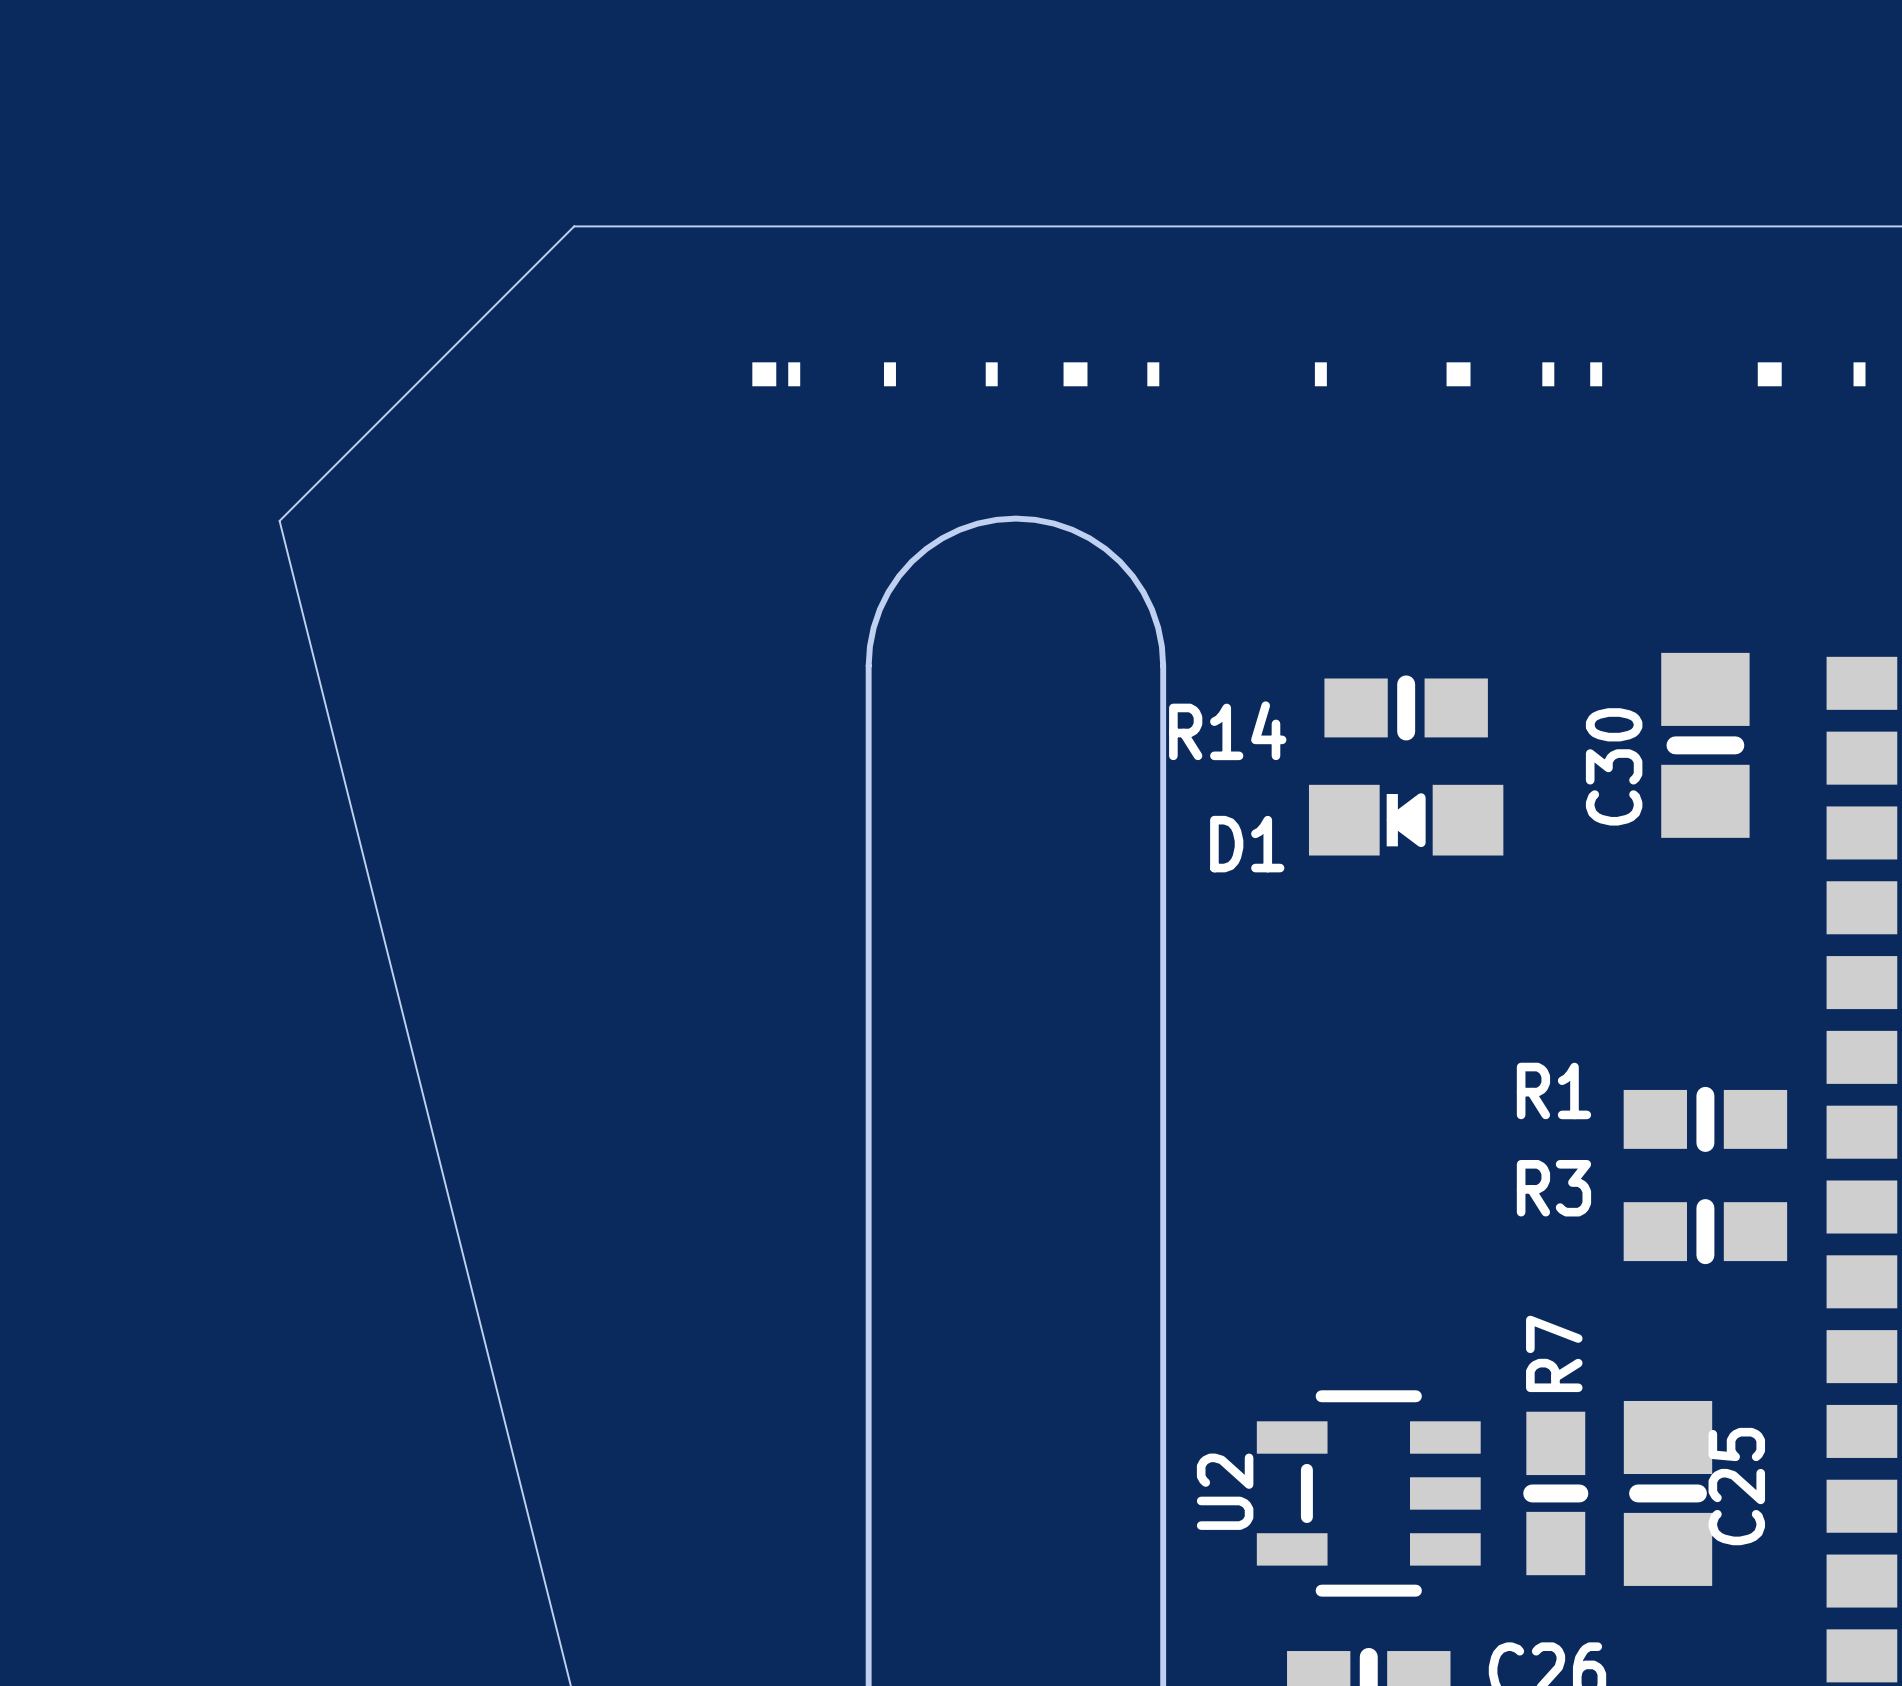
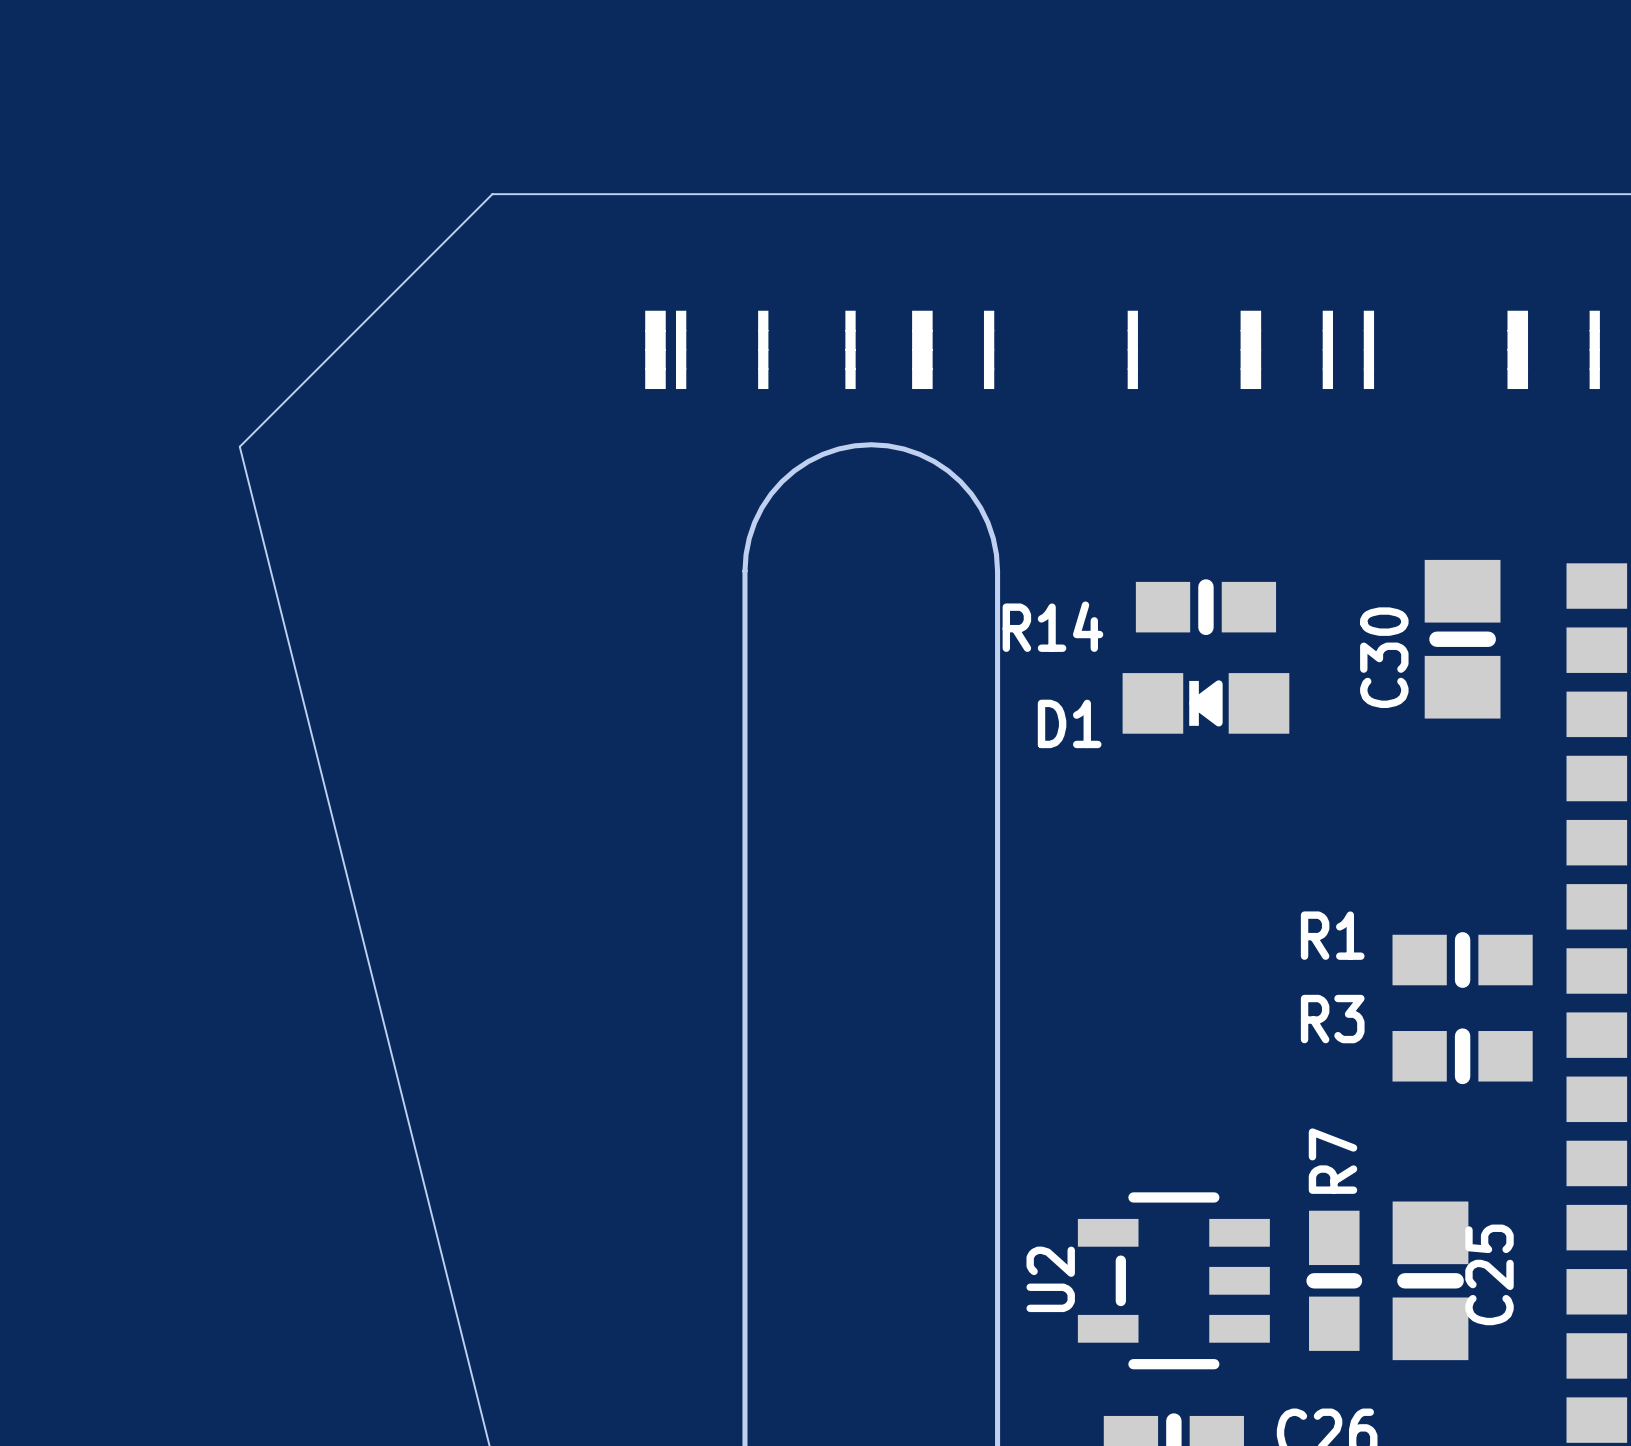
drawing: none -> [645, 329, 687, 390]
drawing: none -> [758, 329, 769, 390]
drawing: none -> [845, 329, 995, 390]
drawing: none -> [1127, 329, 1138, 390]
drawing: none -> [1240, 329, 1262, 390]
drawing: none -> [1322, 329, 1375, 390]
drawing: none -> [1507, 329, 1529, 390]
drawing: none -> [1589, 329, 1600, 390]

